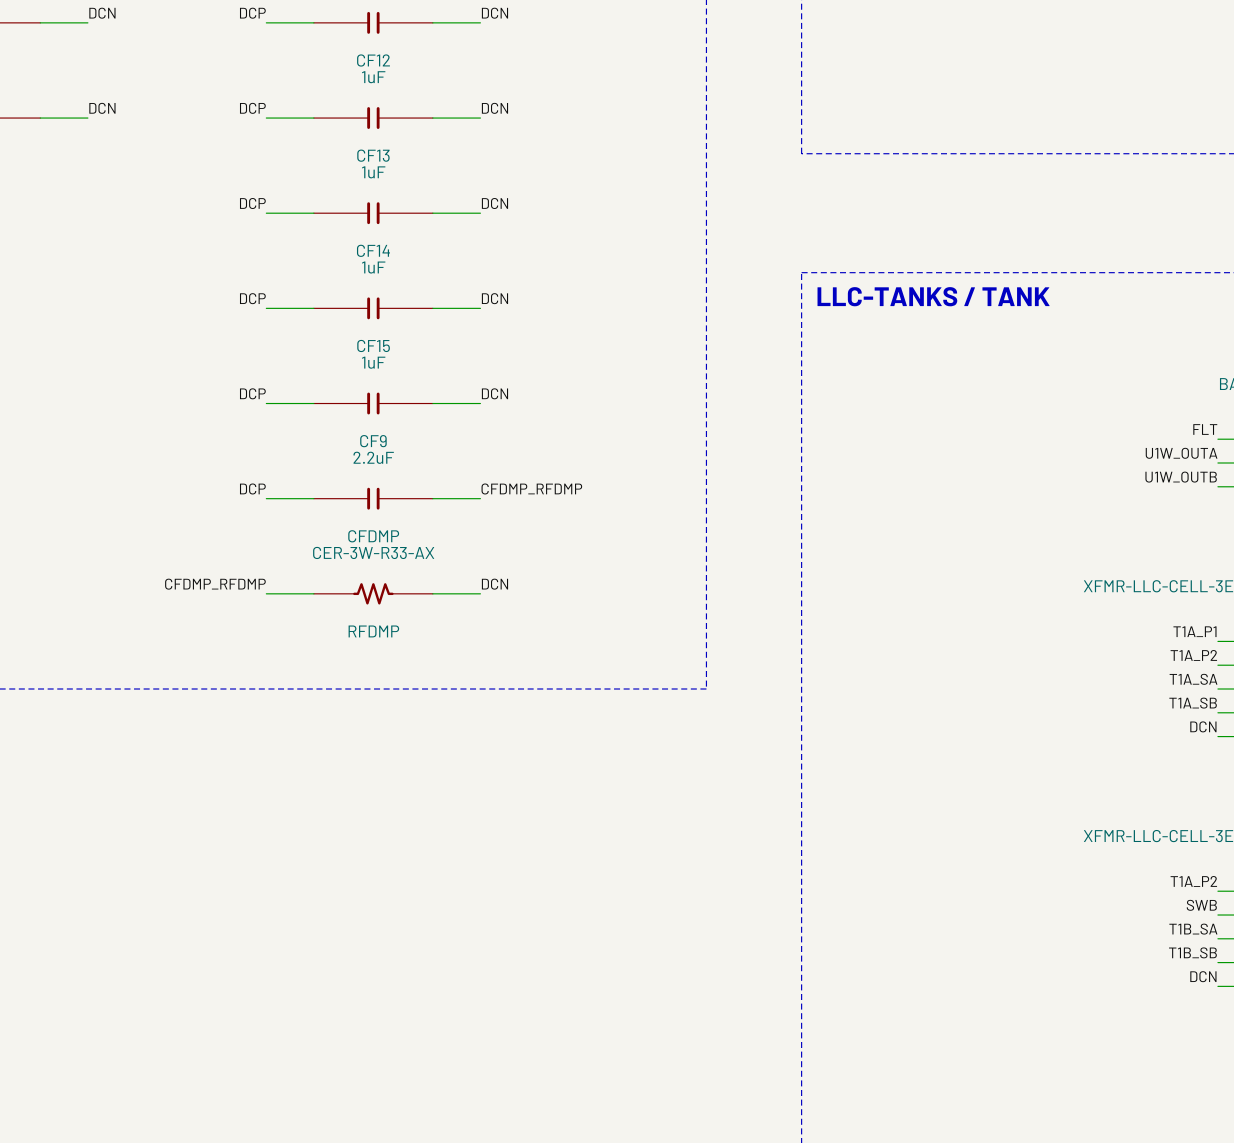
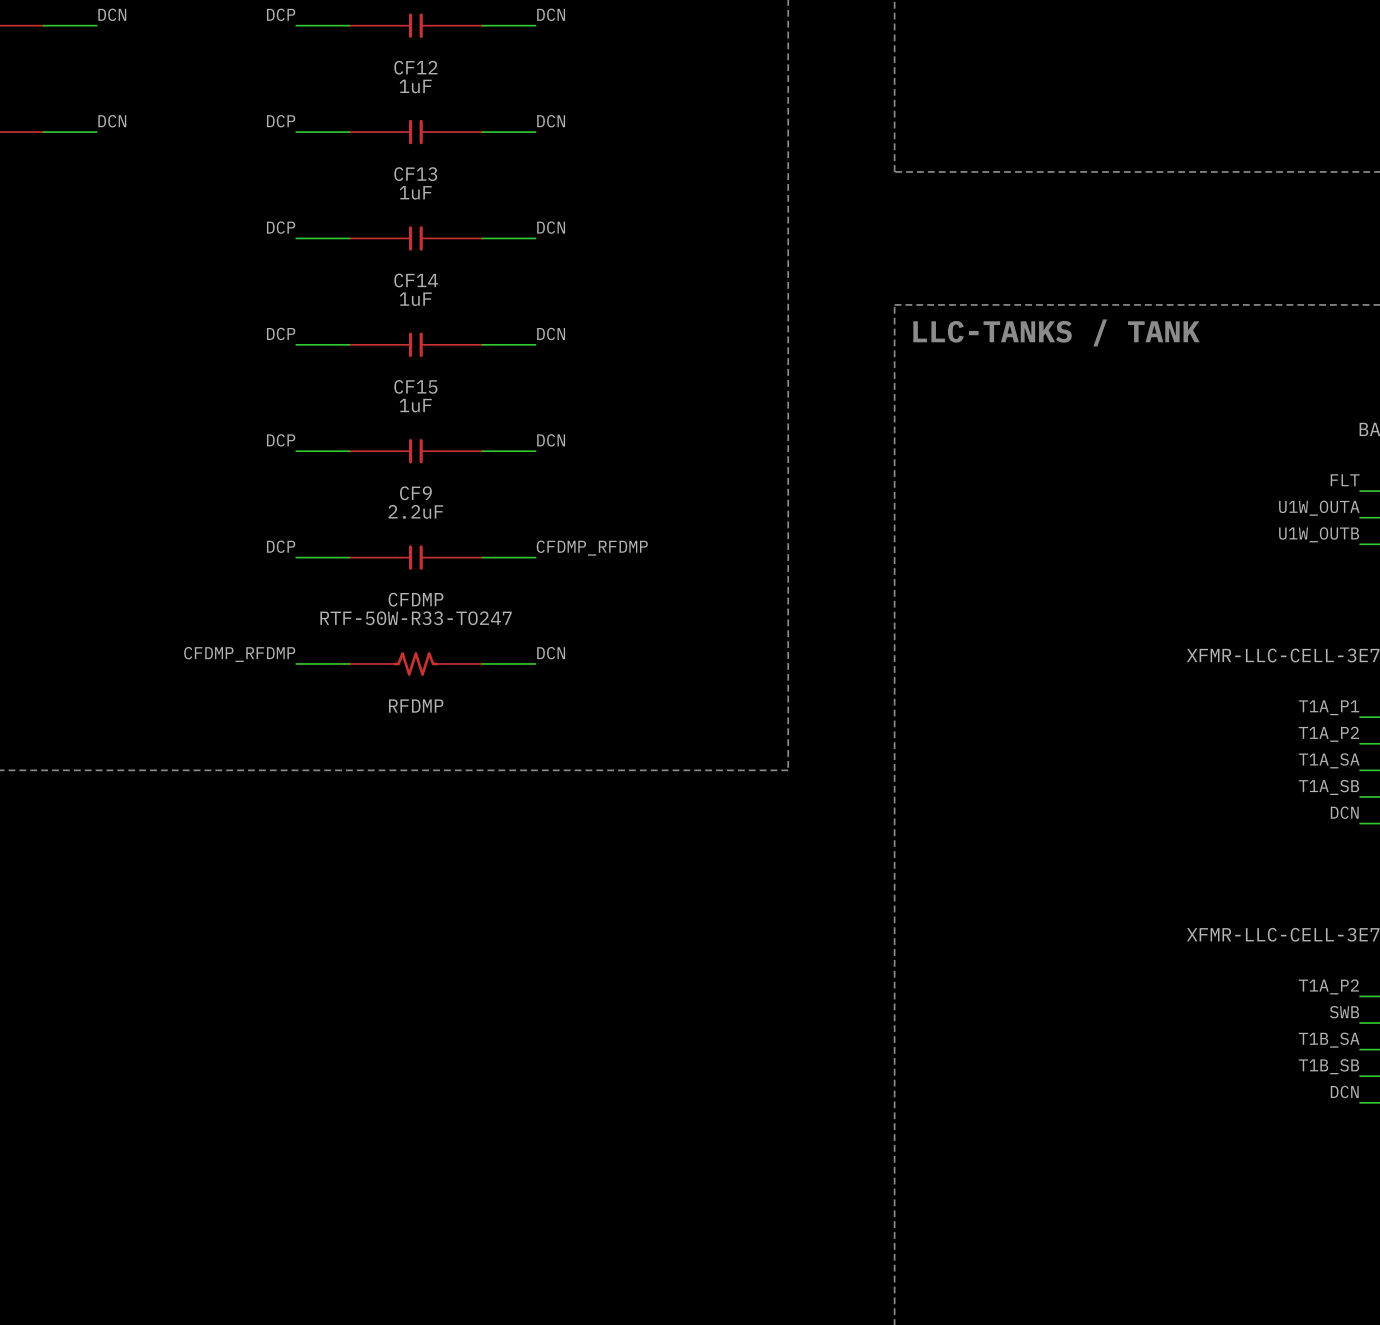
RFDMP value: CER-3W-R33-AX (373, 552) -> RTF-50W-R33-TO247 (416, 618)

